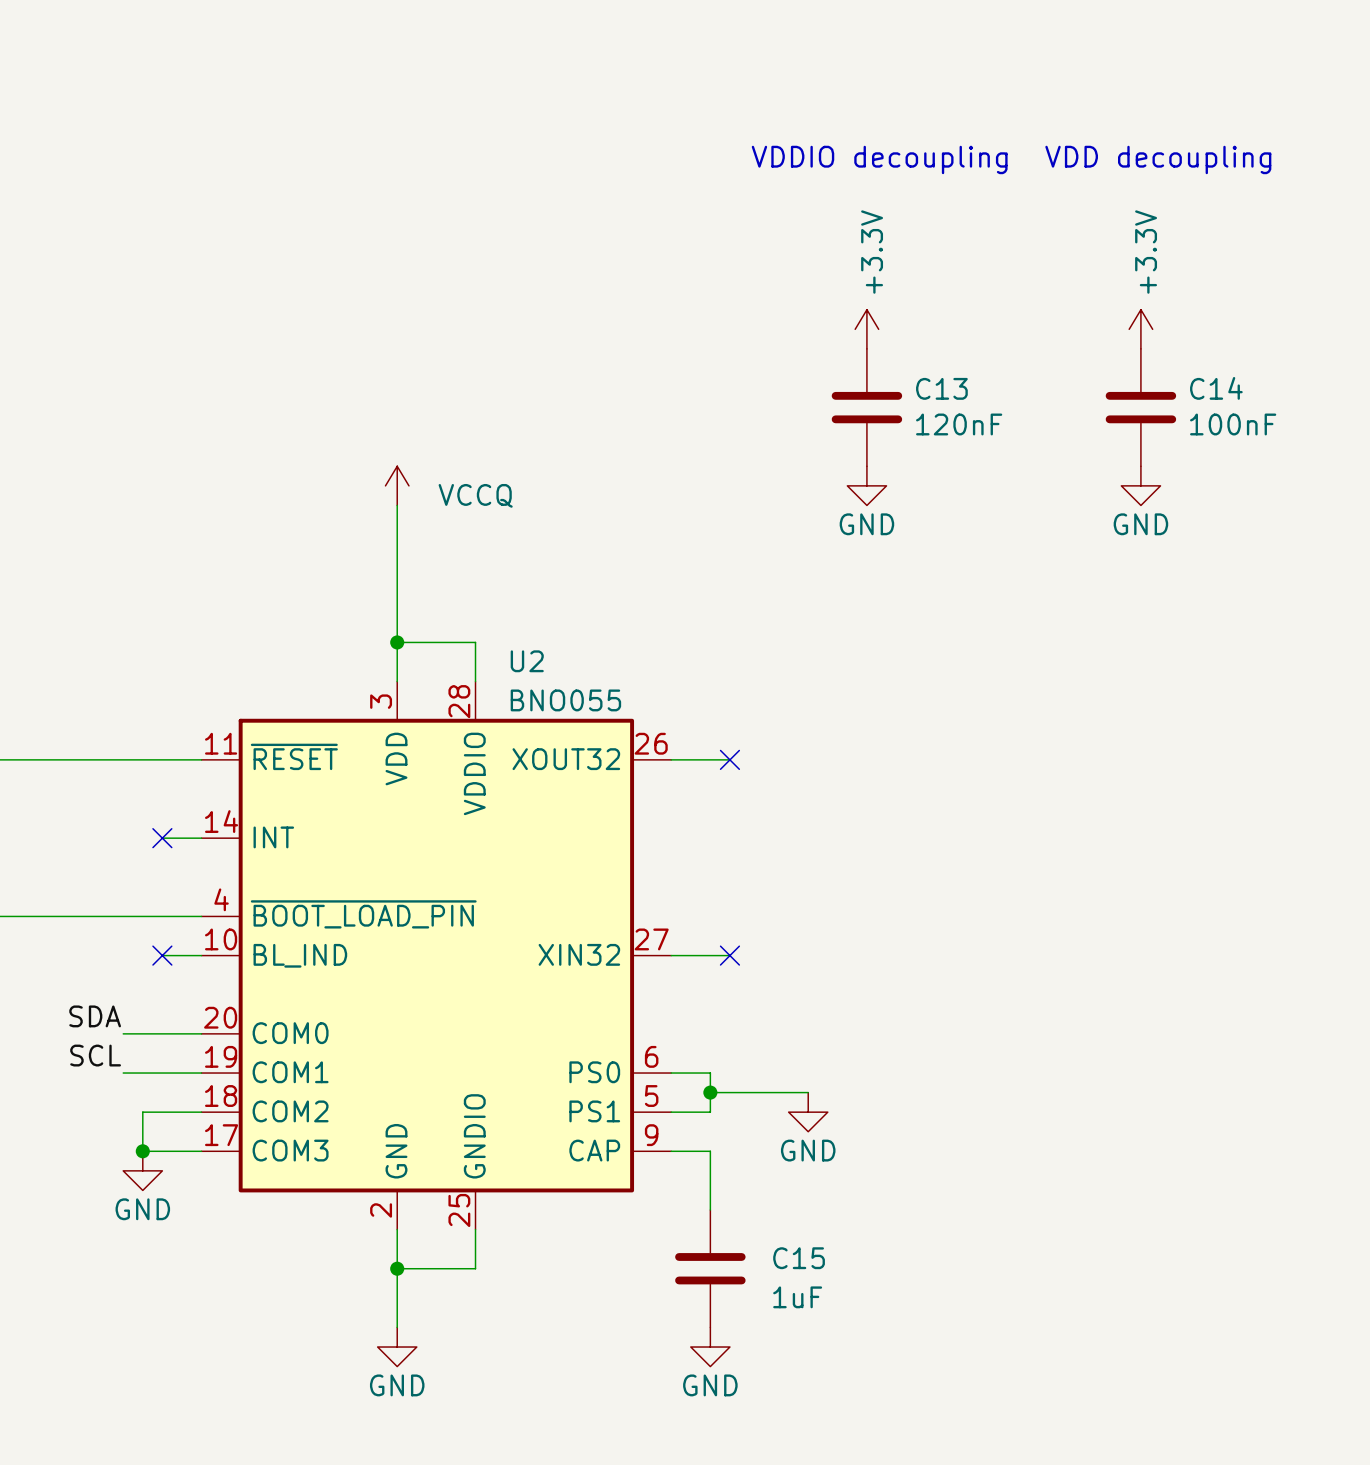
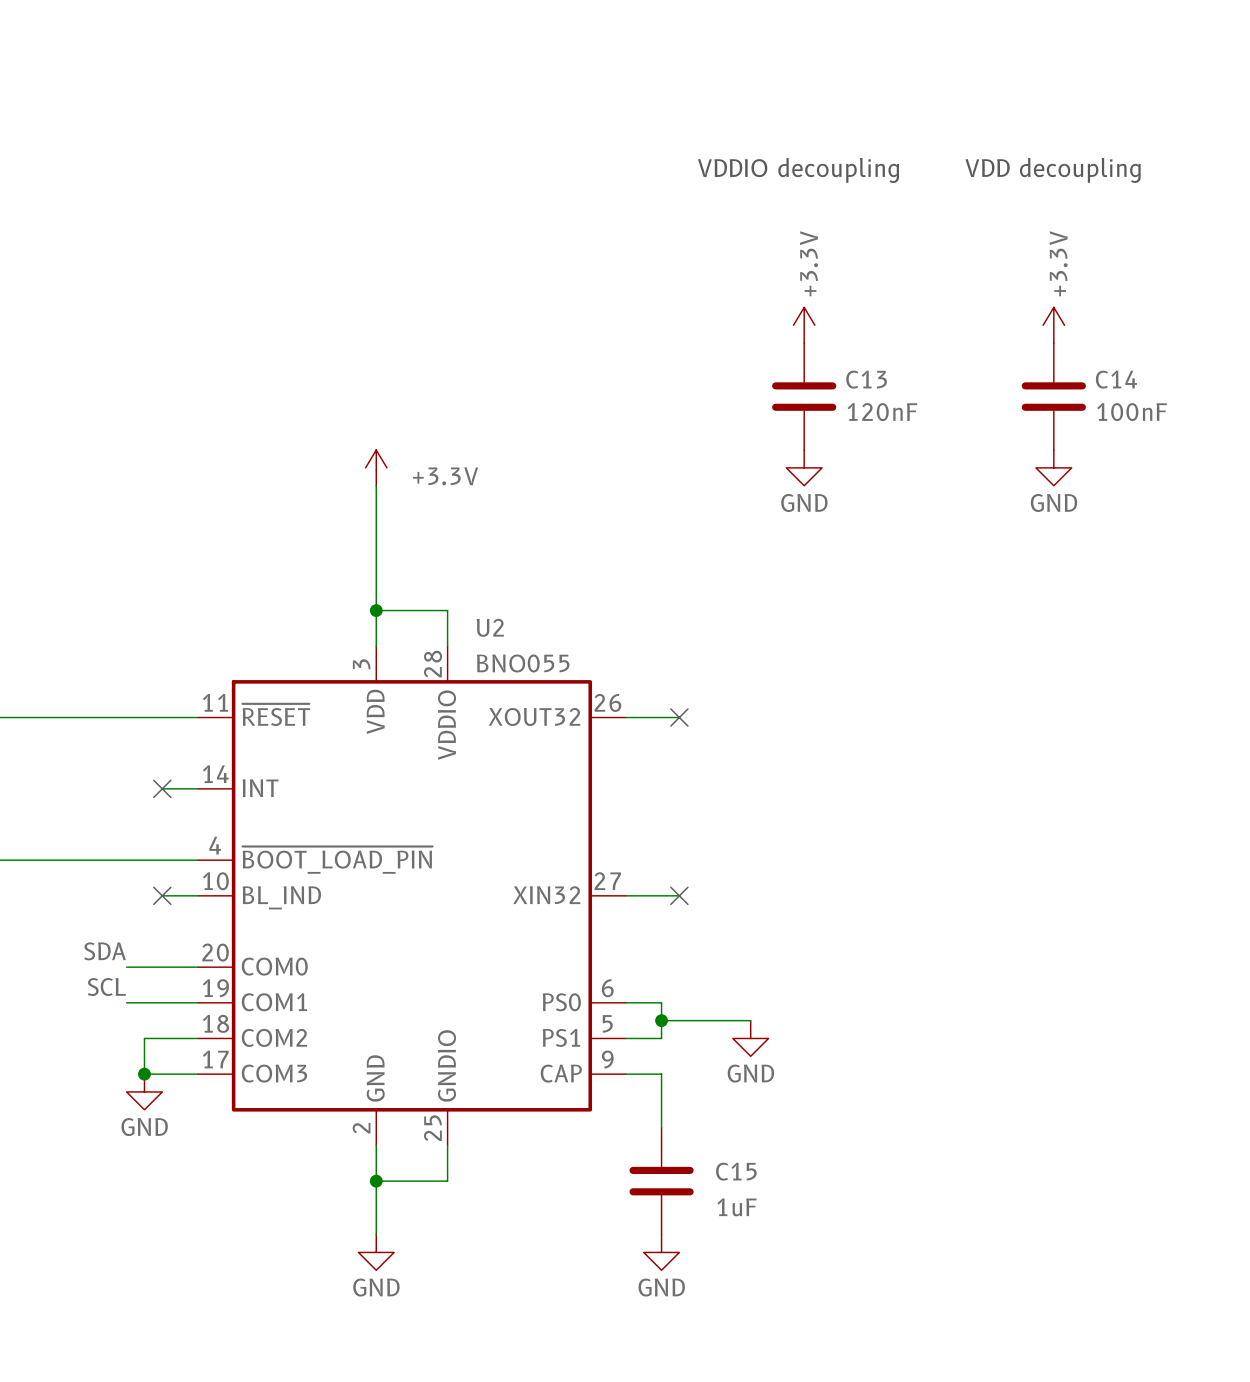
power symbol: VCCQ (397, 485) -> +3.3V (376, 467)

